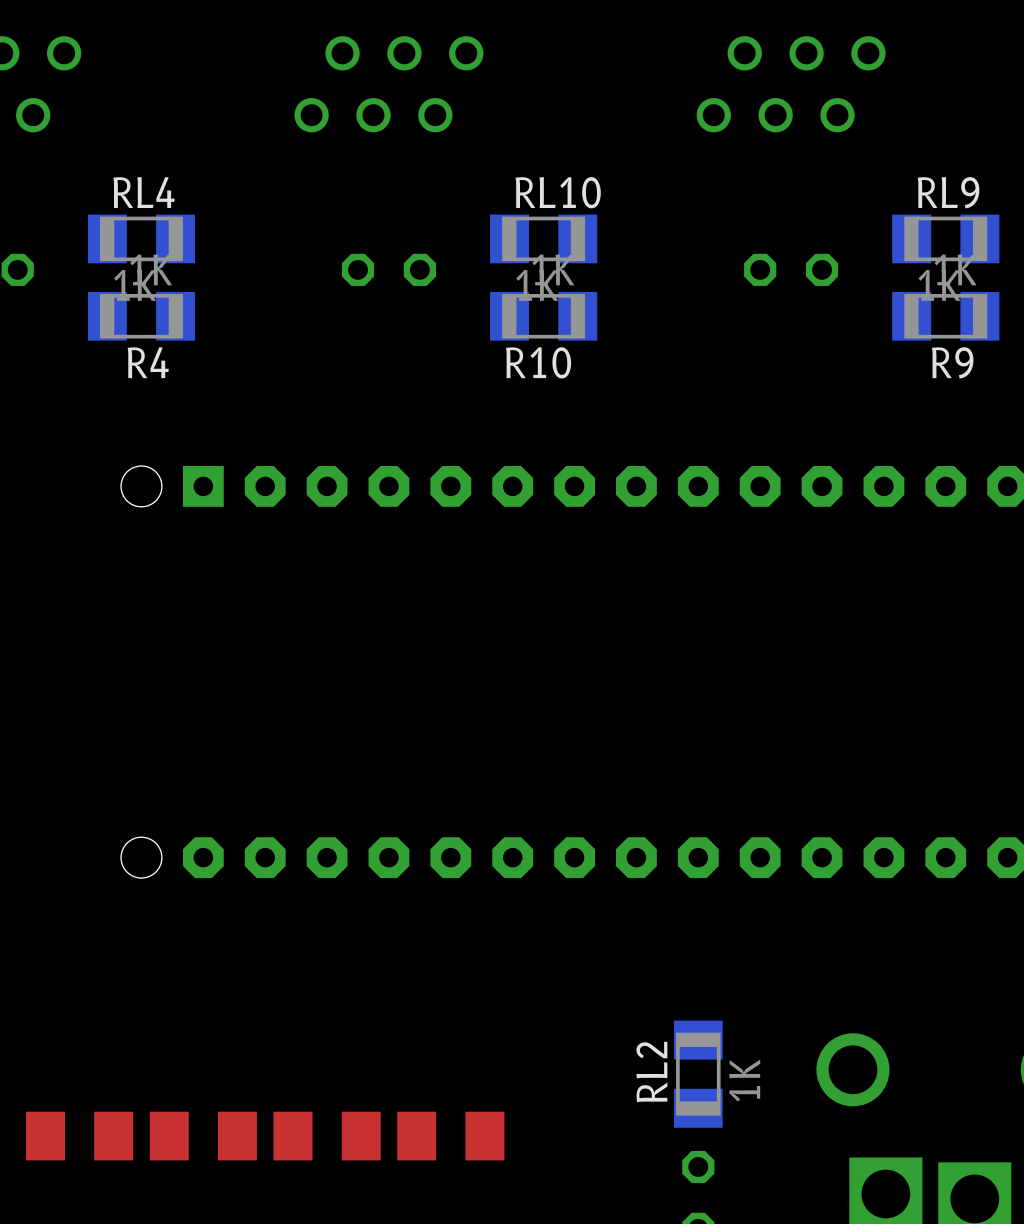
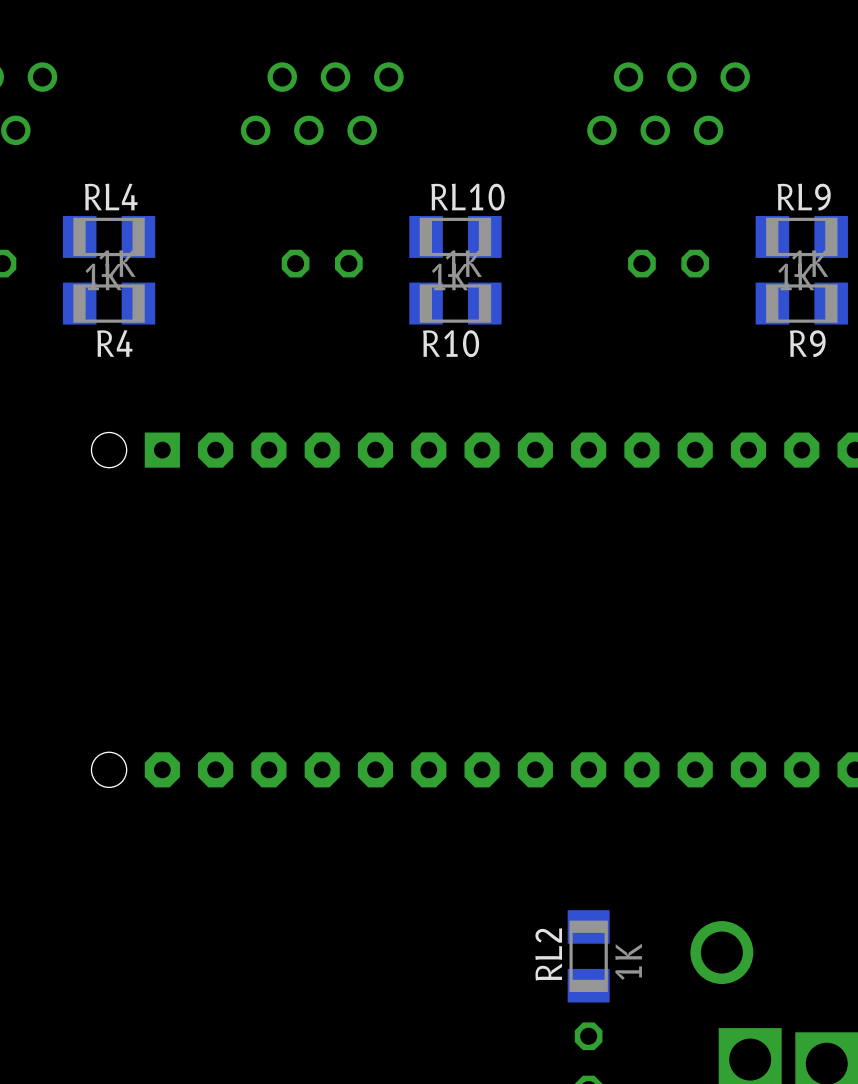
part: (79, 1136) -> none
part: (203, 1136) -> none
part: (327, 1136) -> none
part: (450, 1136) -> none

